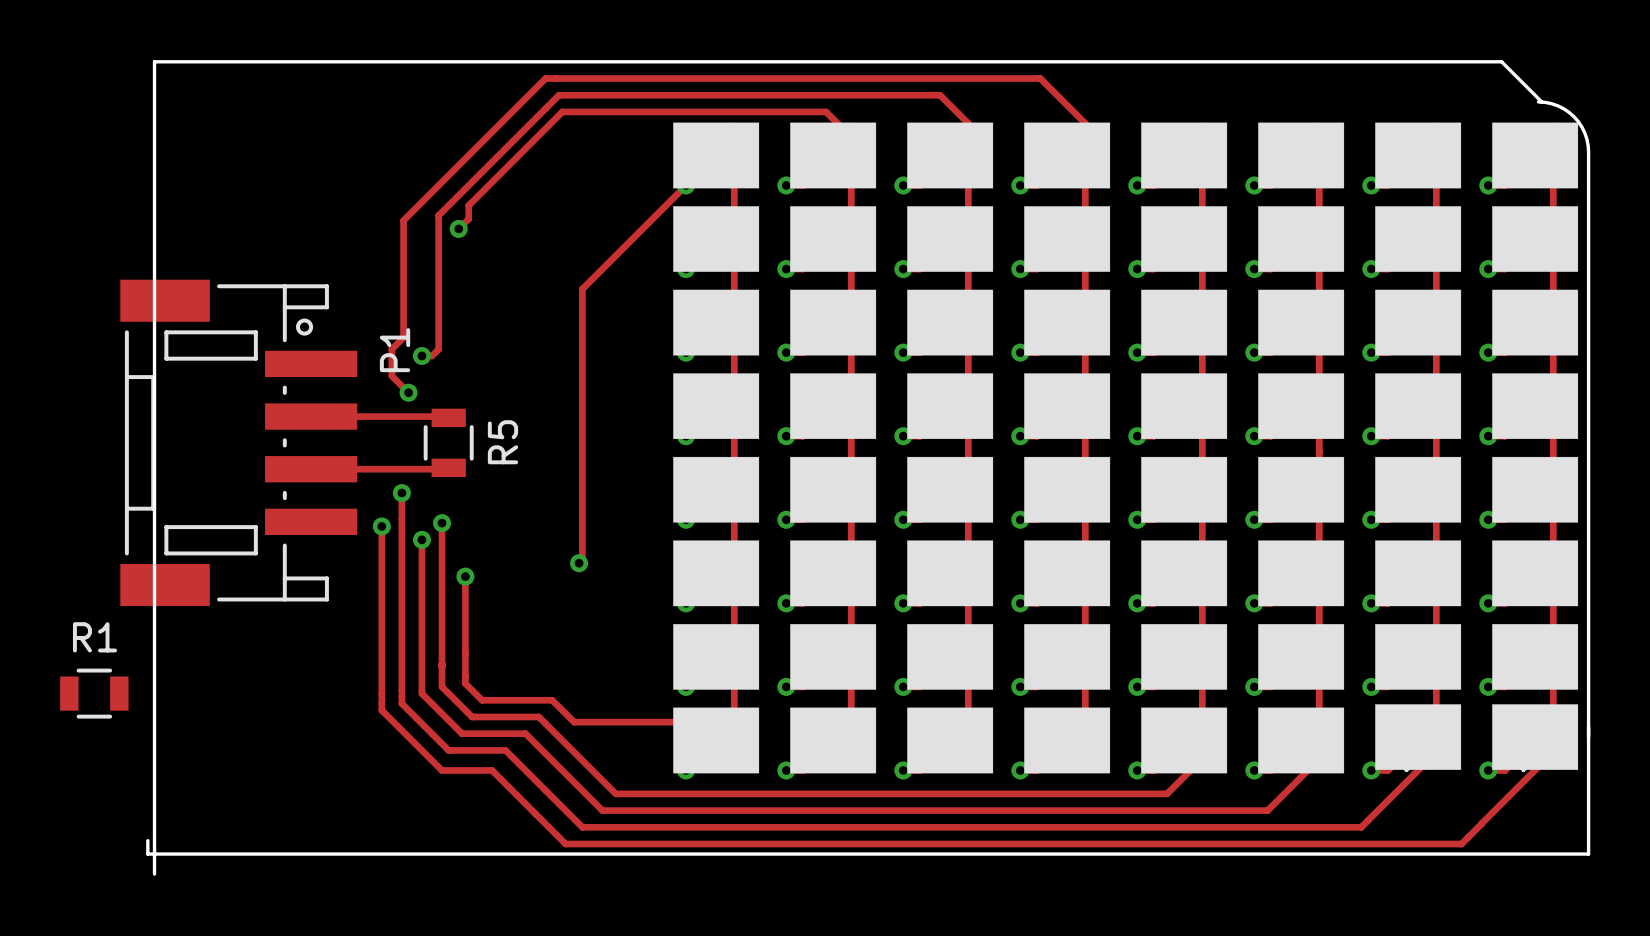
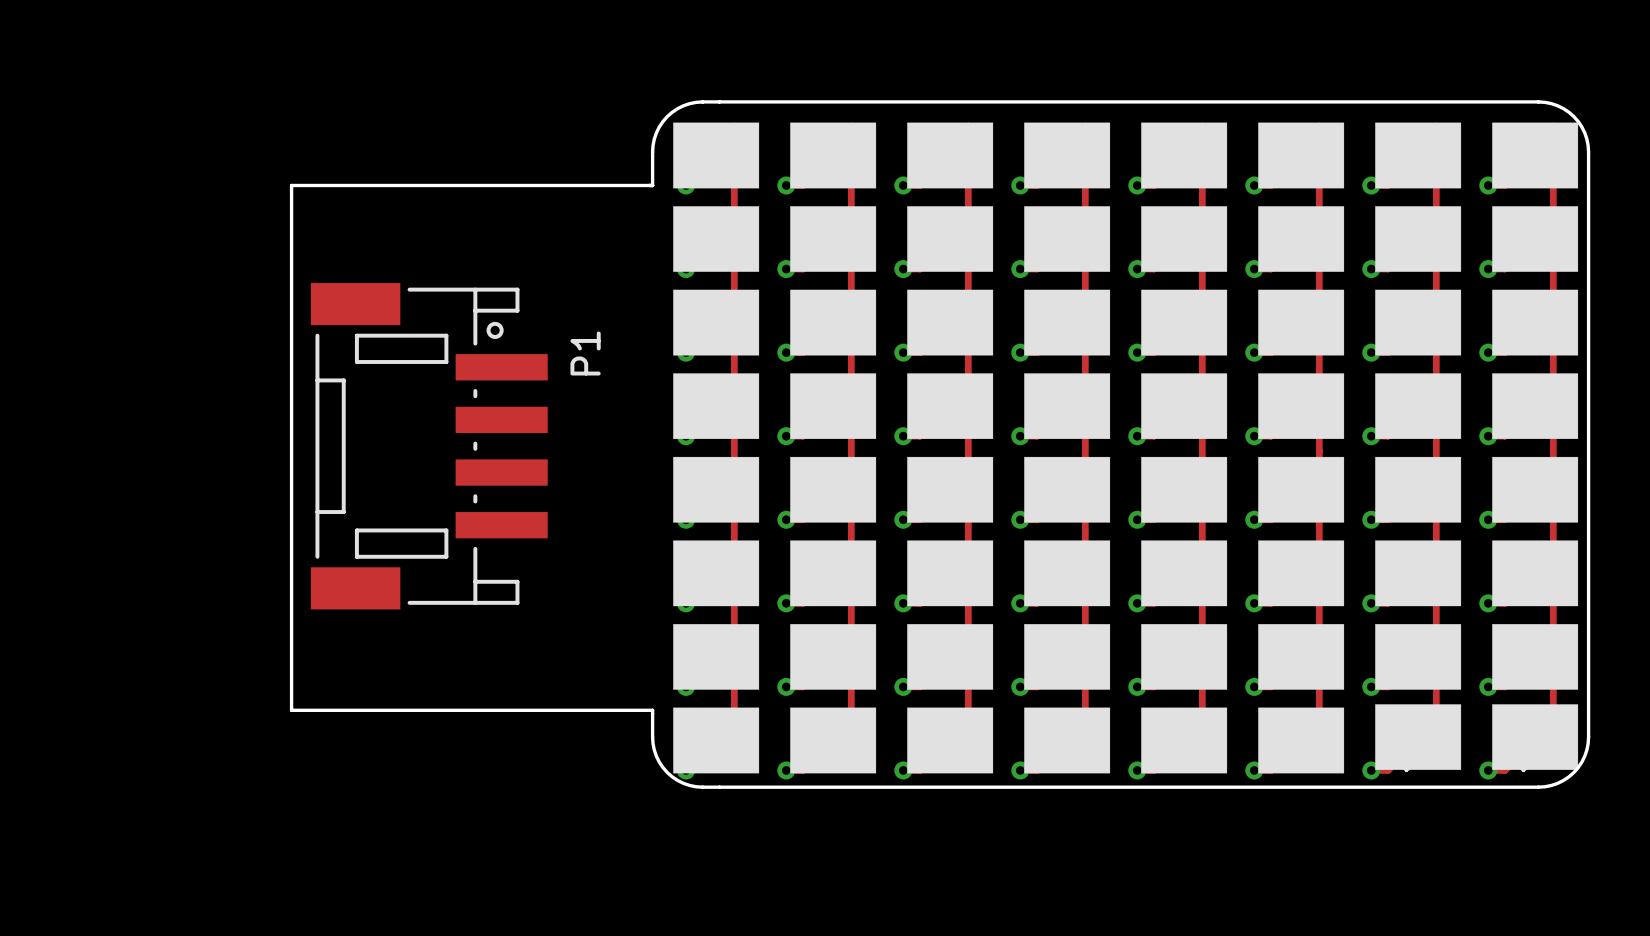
board edge: (1541, 101) (1501, 61) (154, 61) (154, 874) -> none
track: (851, 137) (826, 111) (562, 111) (468, 205) (468, 218) (458, 228) -> none
track: (968, 137) (968, 123) (940, 95) (559, 95) (438, 215) (438, 349) (431, 355) (421, 355) -> none
track: (1085, 137) (1085, 123) (1040, 78) (545, 78) (403, 220) (403, 337) (391, 349) (391, 376) (408, 392) -> none
track: (686, 185) (582, 289) (582, 559) (579, 563) -> none
via: (458, 228) -> none
via: (421, 355) -> none
via: (408, 392) -> none
track: (311, 416) (448, 417) -> none
P1 position: (238, 442) -> (429, 446)
R5: (448, 442) -> none
track: (448, 467) (311, 469) -> none
track: (401, 493) (401, 703) (448, 750) (505, 750) (582, 827) (1361, 827) (1436, 752) (1436, 722) -> none
via: (401, 493) -> none
track: (442, 523) (442, 686) (472, 716) (538, 716) (615, 793) (1167, 793) (1202, 758) (1202, 722) -> none
via: (442, 523) -> none
track: (381, 526) (381, 710) (442, 770) (492, 770) (565, 844) (1461, 844) (1481, 823) -> none
via: (381, 526) -> none
track: (421, 539) (421, 693) (462, 733) (525, 733) (602, 810) (1267, 810) (1319, 758) (1319, 722) -> none
via: (421, 539) -> none
via: (579, 563) -> none
track: (465, 576) (465, 683) (482, 700) (552, 700) (574, 722) (734, 722) -> none
via: (465, 576) -> none
R1: (94, 693) -> none
track: (1553, 722) (1553, 751) (1481, 823) -> none
board edge: (1588, 737) (1588, 854) (147, 854) (147, 840) -> (1588, 737) (1584, 756) (1573, 772) (1557, 783) (1538, 787) (702, 787) (689, 785) (677, 780) (667, 772) (659, 762) (653, 743) (652, 710) (291, 710) (291, 185) (652, 185) (653, 145) (659, 126) (667, 116) (677, 108) (696, 102) (1538, 101)

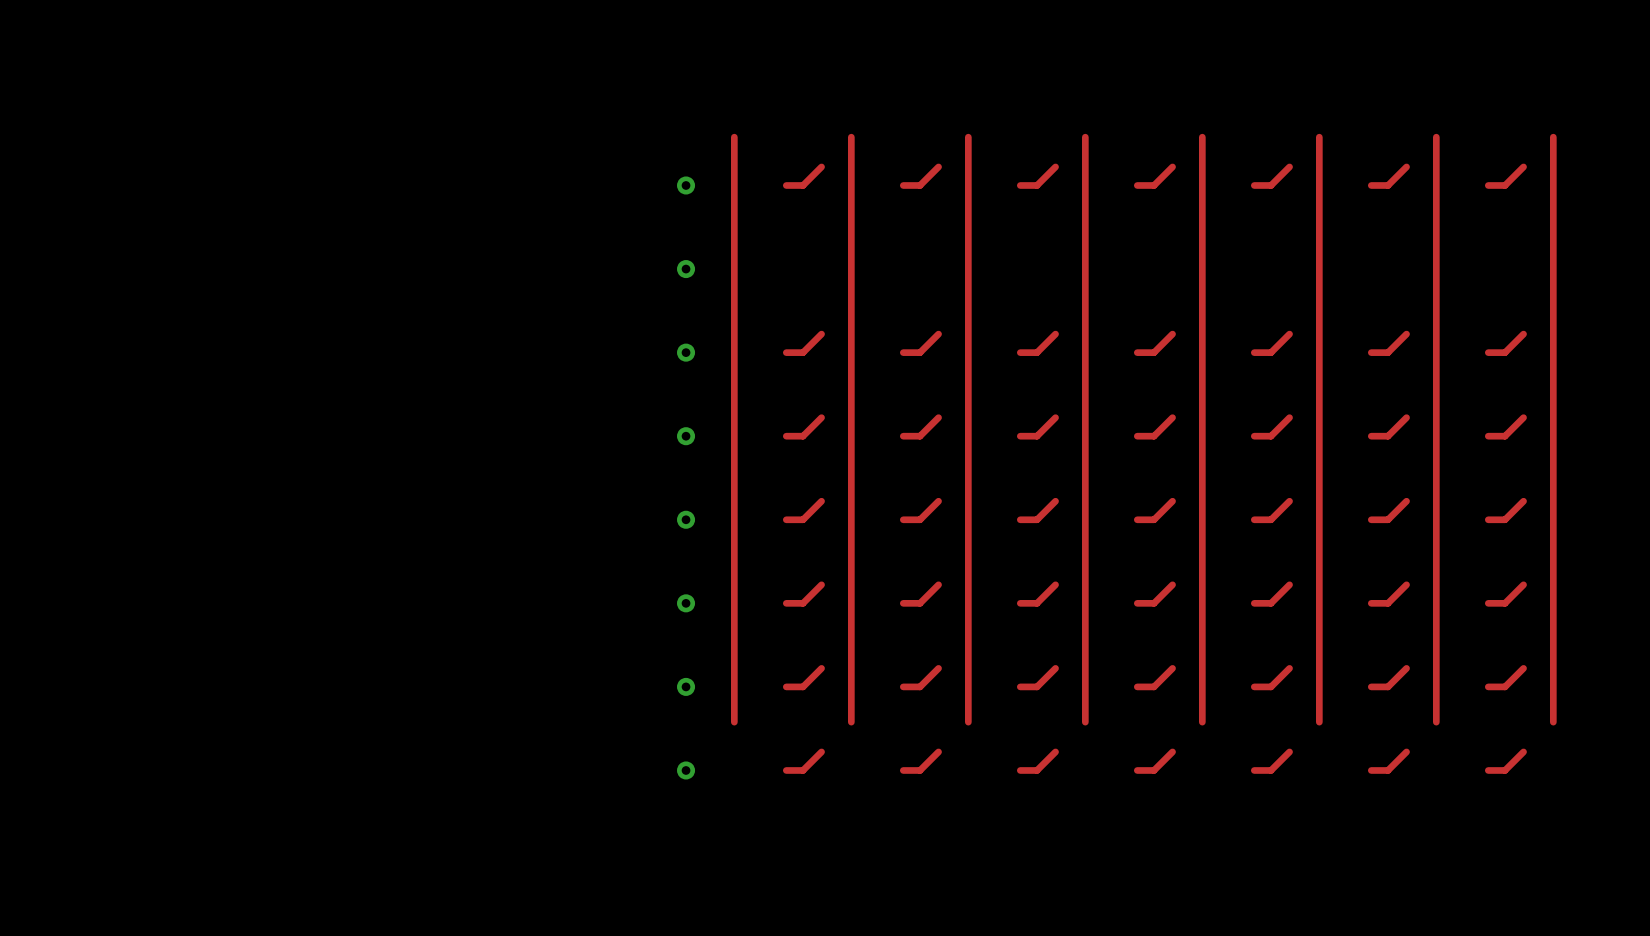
board edge: (702, 101) (1538, 101) (1557, 105) (1568, 112) (1581, 126) (1586, 139) (1588, 152) (1588, 737) (1584, 756) (1578, 767) (1563, 780) (1551, 785) (1538, 787) (702, 787) (689, 785) (677, 780) (667, 772) (659, 762) (653, 743) (652, 710) (291, 710) (291, 185) (652, 185) (653, 145) (659, 126) (667, 116) (677, 108) (689, 103) (702, 101) -> none
drawing: [673, 122, 1579, 774] -> none
via: (786, 185) -> none
via: (903, 185) -> none
via: (1020, 185) -> none
via: (1137, 185) -> none
via: (1254, 185) -> none
via: (1371, 185) -> none
via: (1488, 185) -> none
via: (786, 269) -> none
via: (903, 269) -> none
via: (1020, 269) -> none
via: (1137, 269) -> none
via: (1254, 269) -> none
via: (1371, 269) -> none
via: (1488, 269) -> none
via: (786, 352) -> none
via: (903, 352) -> none
via: (1020, 352) -> none
via: (1137, 352) -> none
via: (1254, 352) -> none
via: (1371, 352) -> none
via: (1488, 352) -> none
via: (786, 436) -> none
via: (903, 436) -> none
via: (1020, 436) -> none
via: (1137, 436) -> none
via: (1254, 436) -> none
via: (1371, 436) -> none
via: (1488, 436) -> none
P1: (429, 446) -> none
via: (786, 519) -> none
via: (903, 519) -> none
via: (1020, 519) -> none
via: (1137, 519) -> none
via: (1254, 519) -> none
via: (1371, 519) -> none
via: (1488, 519) -> none
via: (786, 603) -> none
via: (903, 603) -> none
via: (1020, 603) -> none
via: (1137, 603) -> none
via: (1254, 603) -> none
via: (1371, 603) -> none
via: (1488, 603) -> none
via: (786, 686) -> none
via: (903, 686) -> none
via: (1020, 686) -> none
via: (1137, 686) -> none
via: (1254, 686) -> none
via: (1371, 686) -> none
via: (1488, 686) -> none
via: (786, 770) -> none
via: (903, 770) -> none
via: (1020, 770) -> none
via: (1137, 770) -> none
via: (1254, 770) -> none
via: (1371, 770) -> none
via: (1488, 770) -> none

